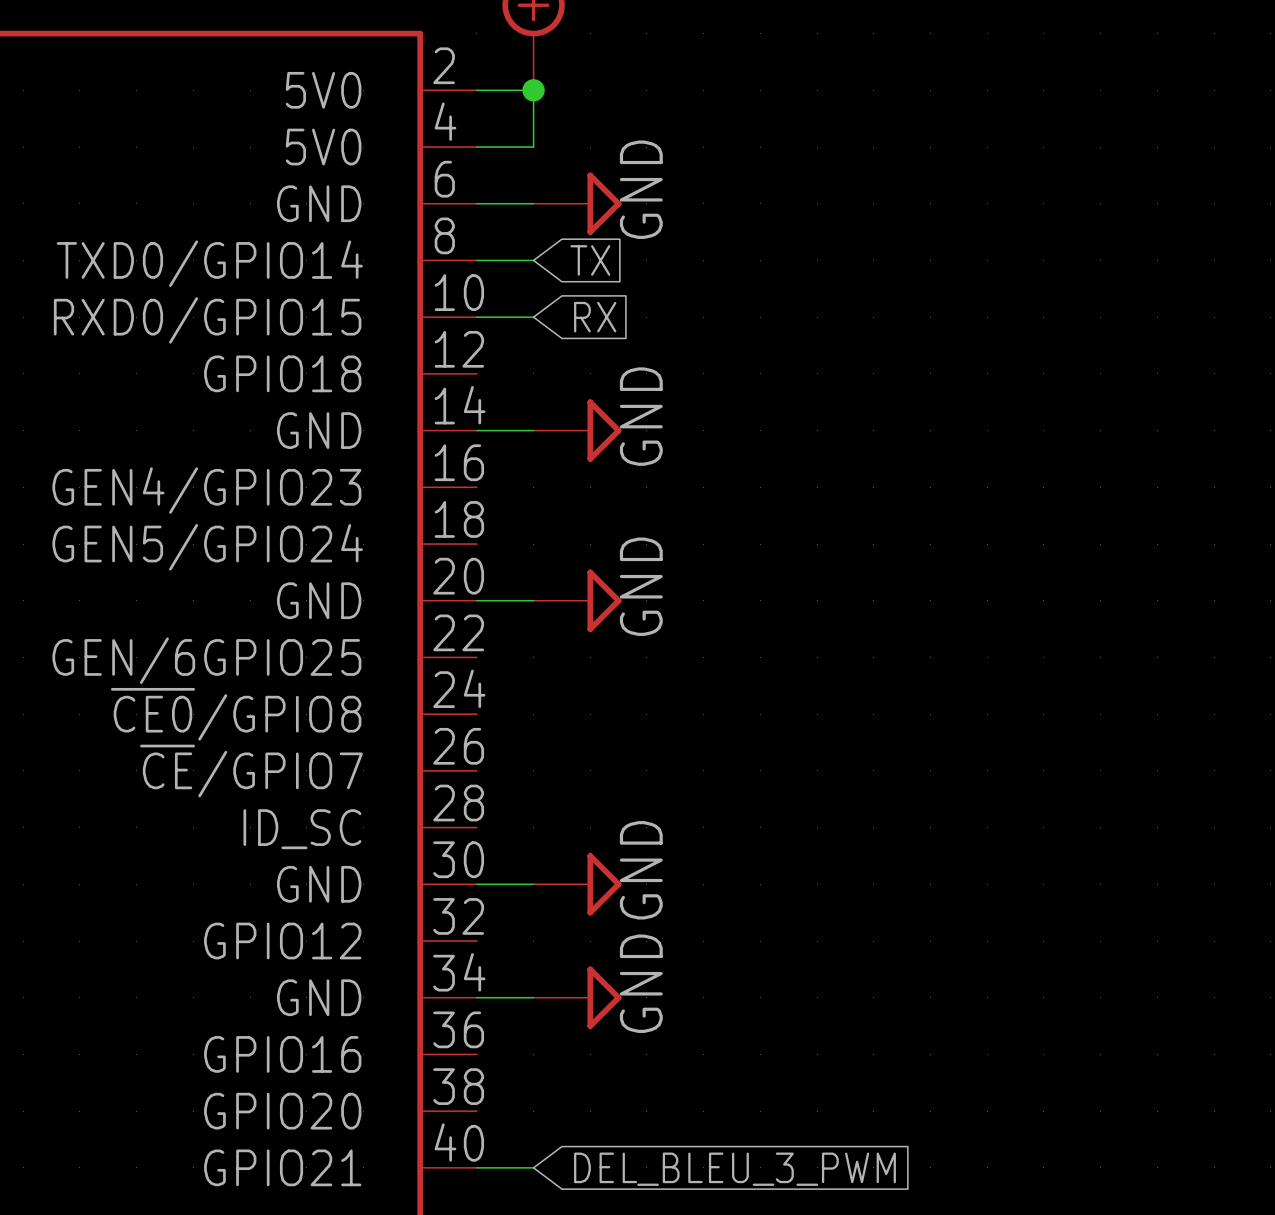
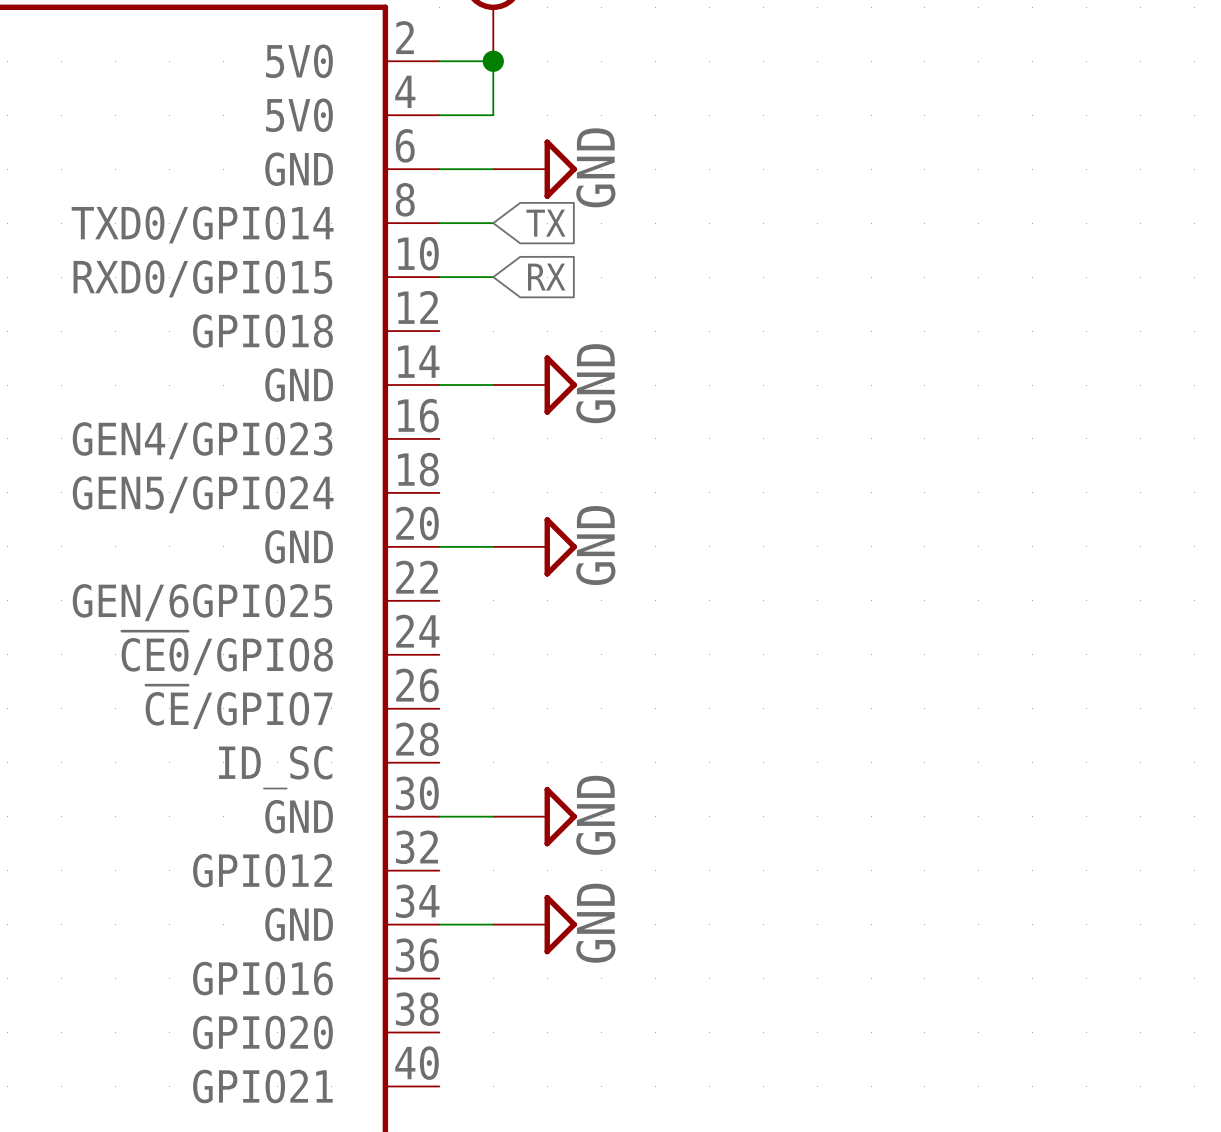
wire: (476, 1167) (533, 1167) -> none
global label: DEL_BLEU_3_PWM (734, 1169) -> none

